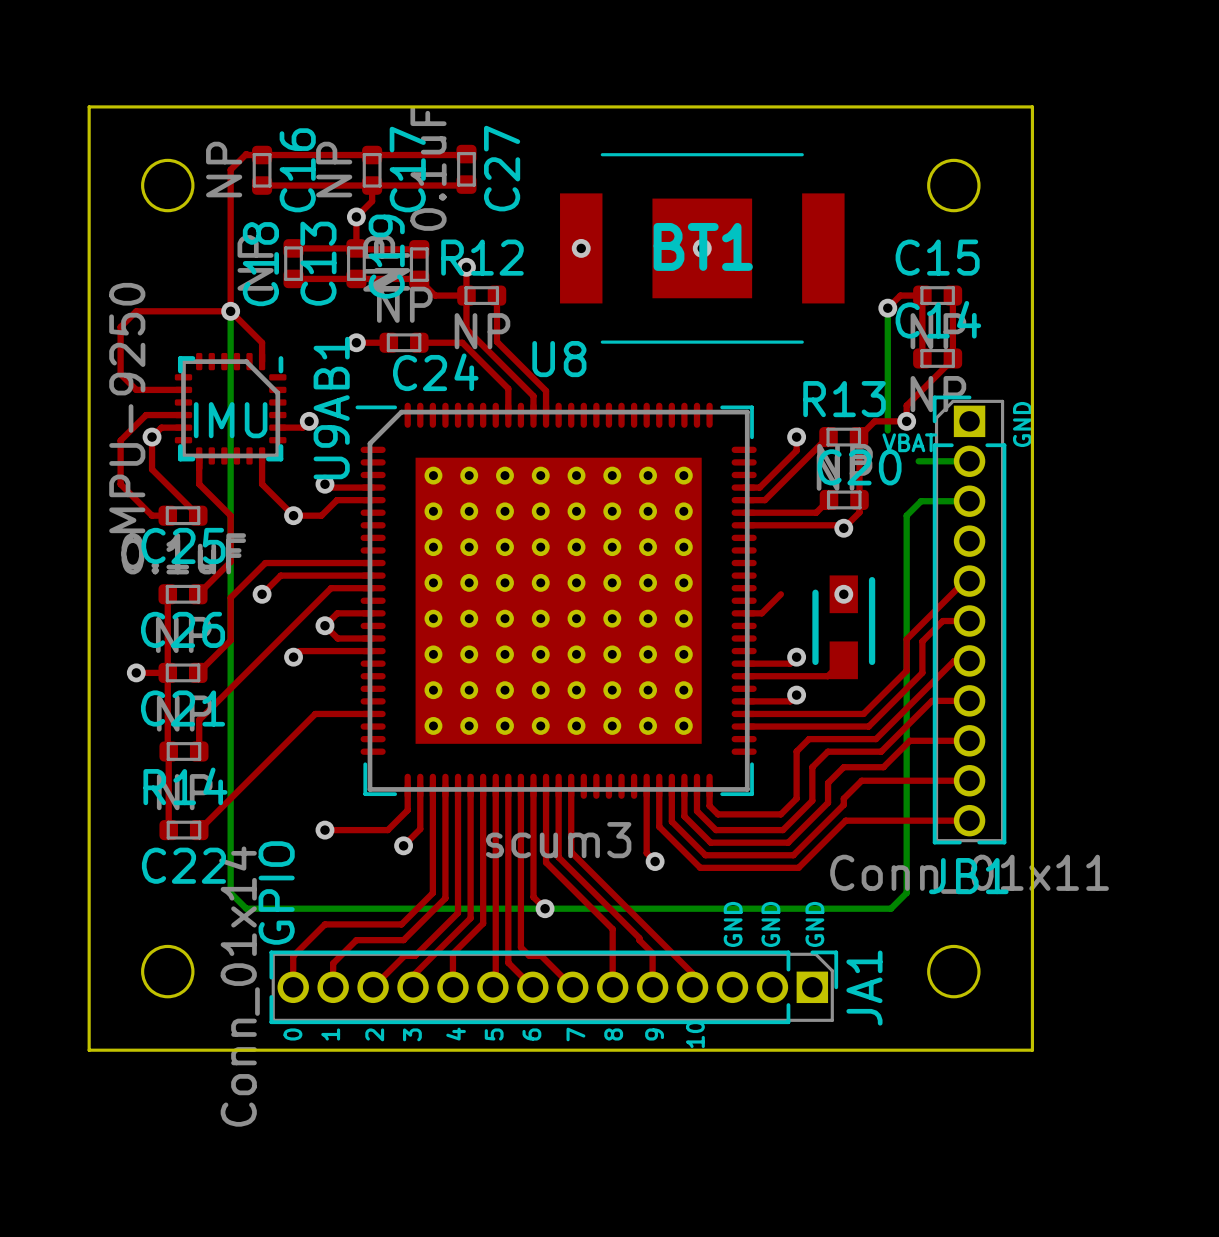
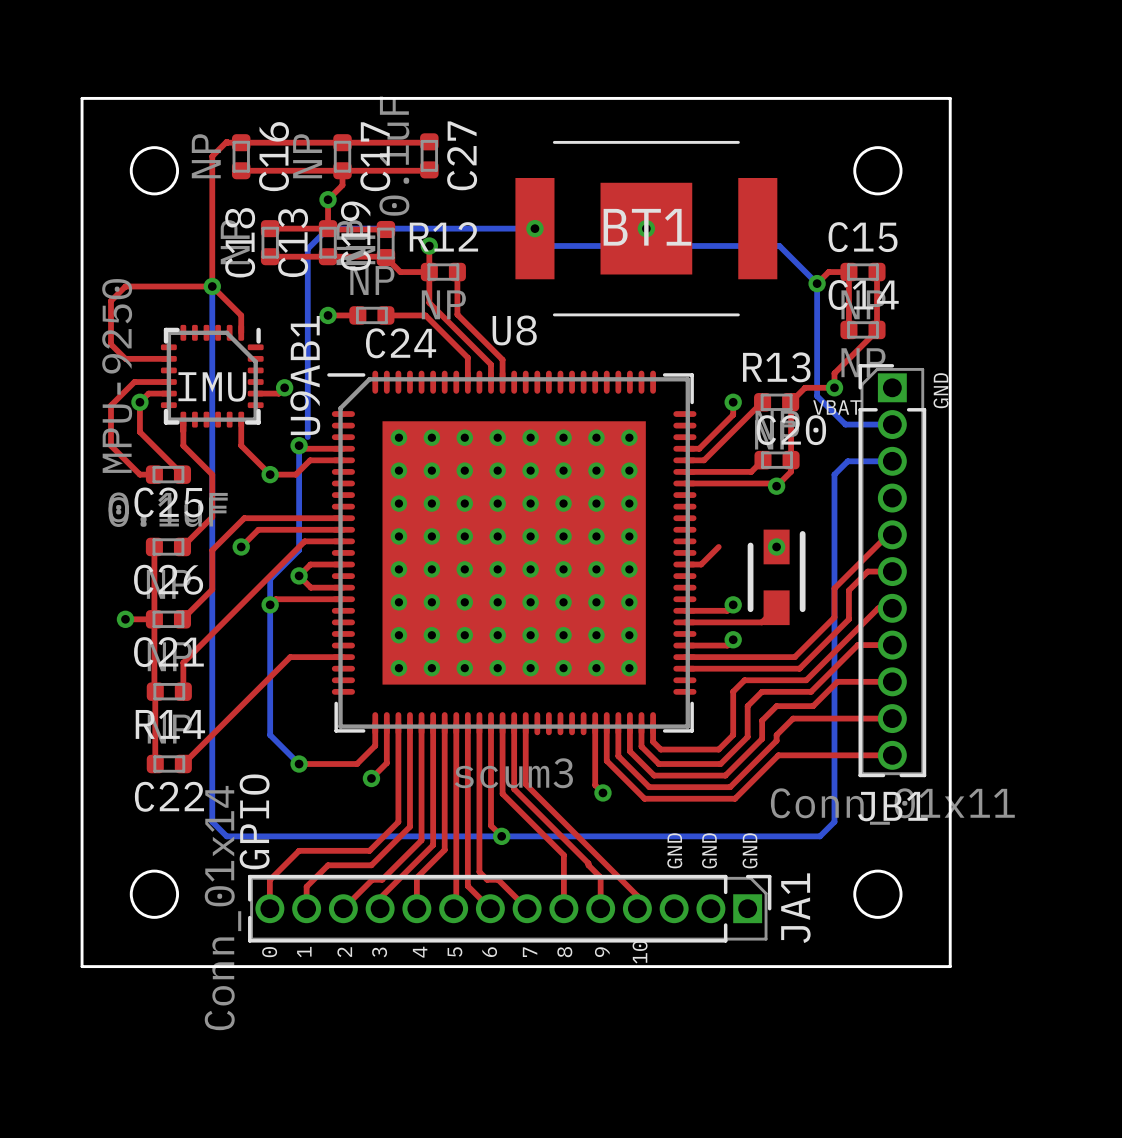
bottom track: none -> (817, 283) (779, 246) (552, 246) (534, 228) (328, 228) (307, 248) (307, 437)
bottom track: none -> (817, 396) (845, 424)
bottom track: none -> (299, 445) (299, 550) (270, 579) (270, 735) (299, 764)

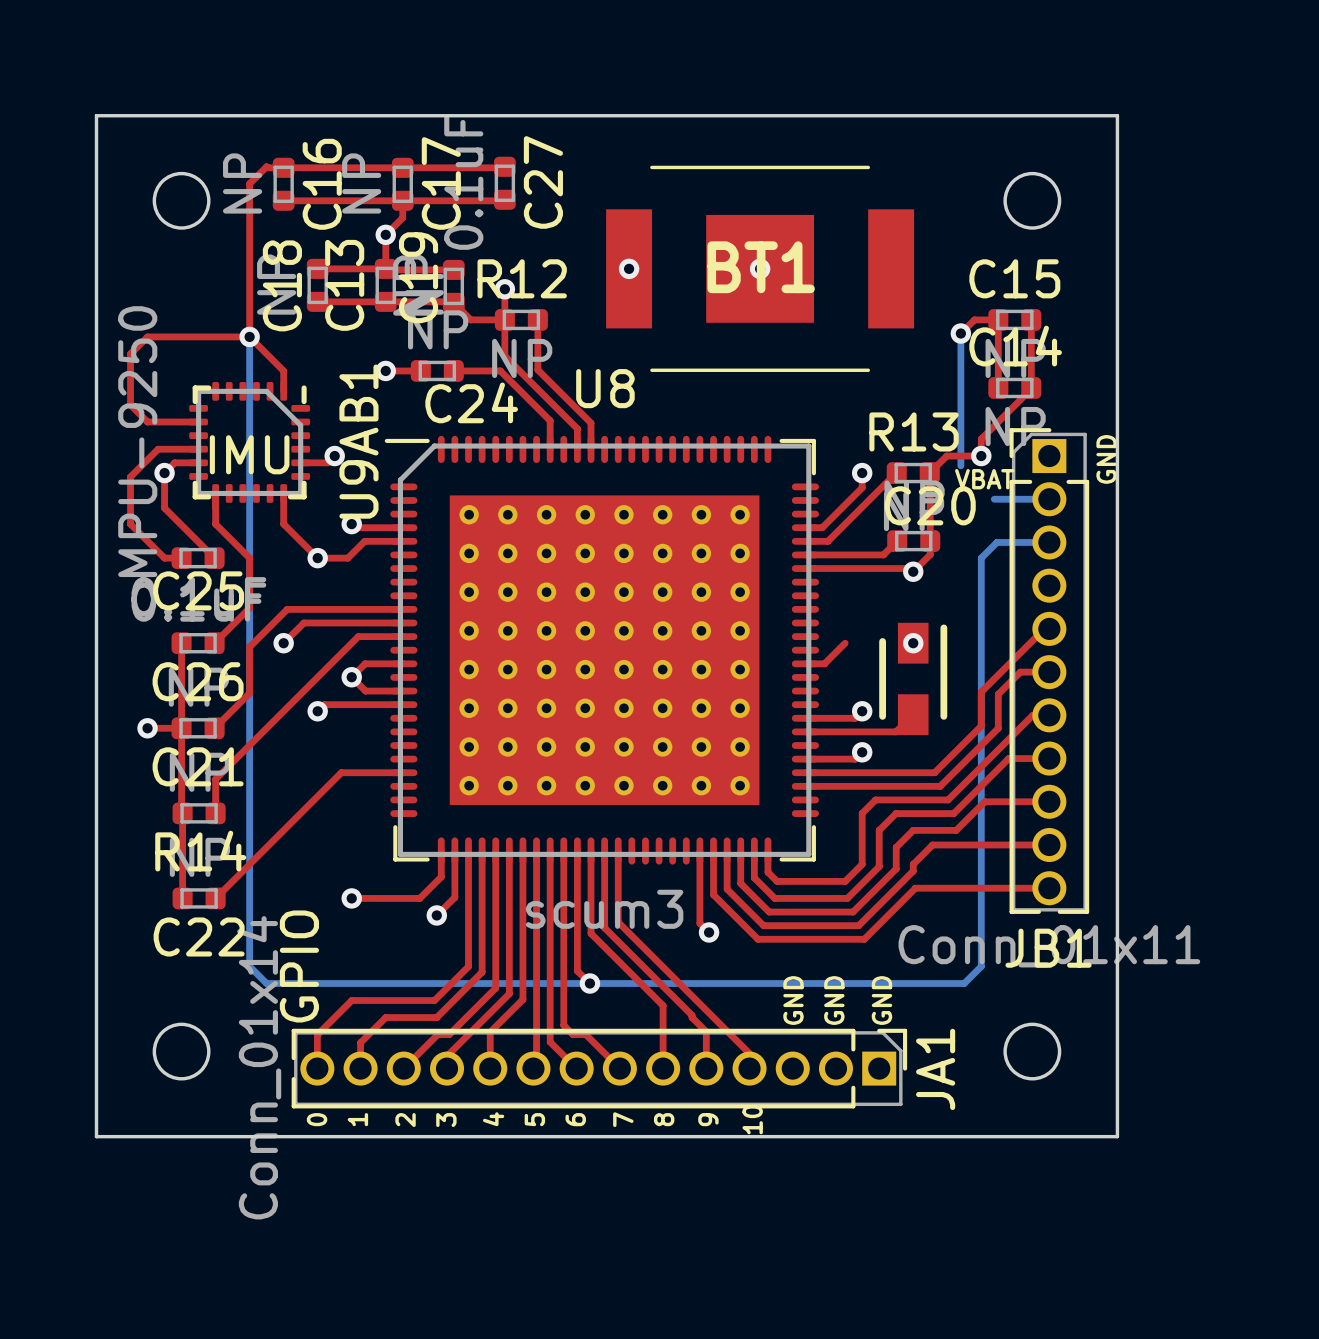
bottom track: (817, 283) (779, 246) (552, 246) (534, 228) (328, 228) (307, 248) (307, 437) -> none
bottom track: (817, 396) (845, 424) -> none
bottom track: (299, 445) (299, 550) (270, 579) (270, 735) (299, 764) -> none

